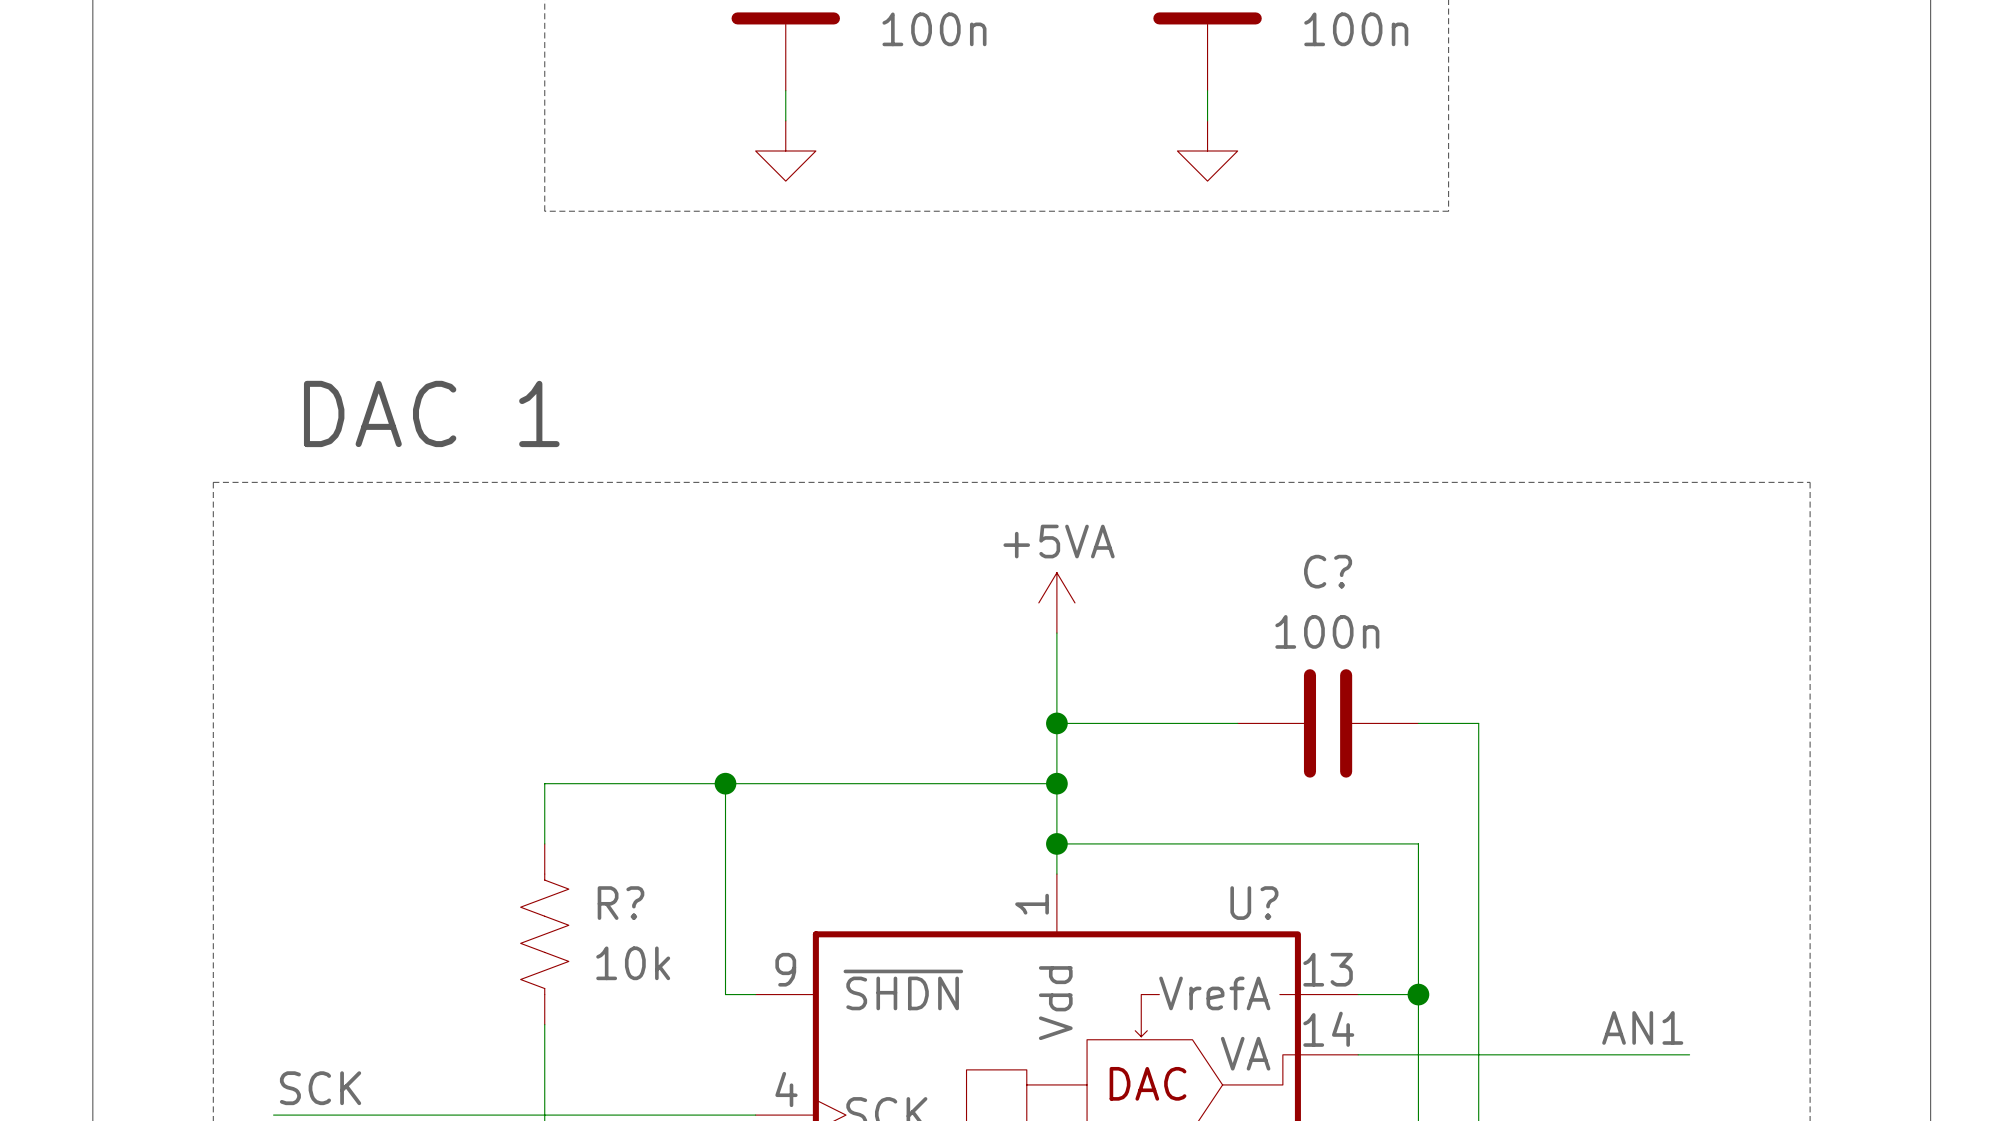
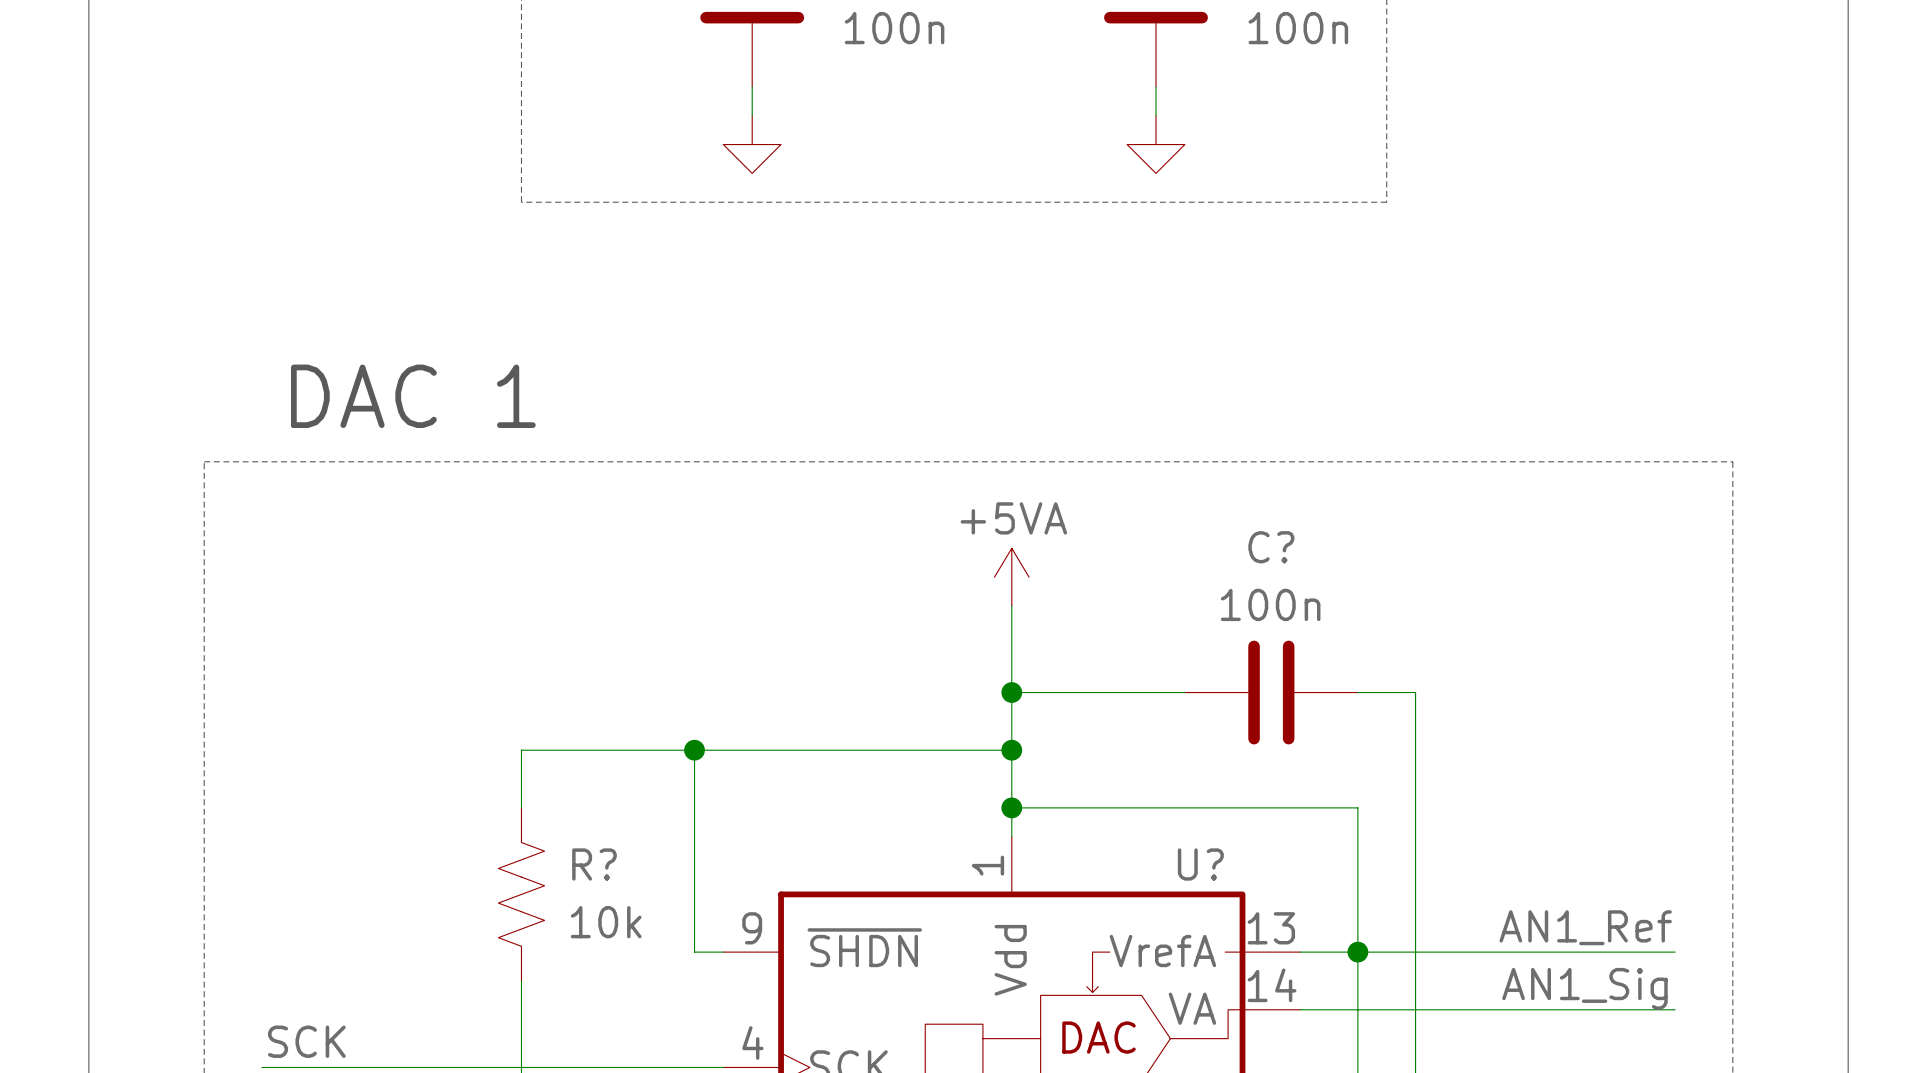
label: none -> AN1_Ref (1585, 927)
wire: none -> (1357, 952) (1675, 952)
label: AN1 (1642, 1027) -> none
label: none -> AN1_Sig (1584, 988)
wire: none -> (1617, 1009) (1675, 1009)

